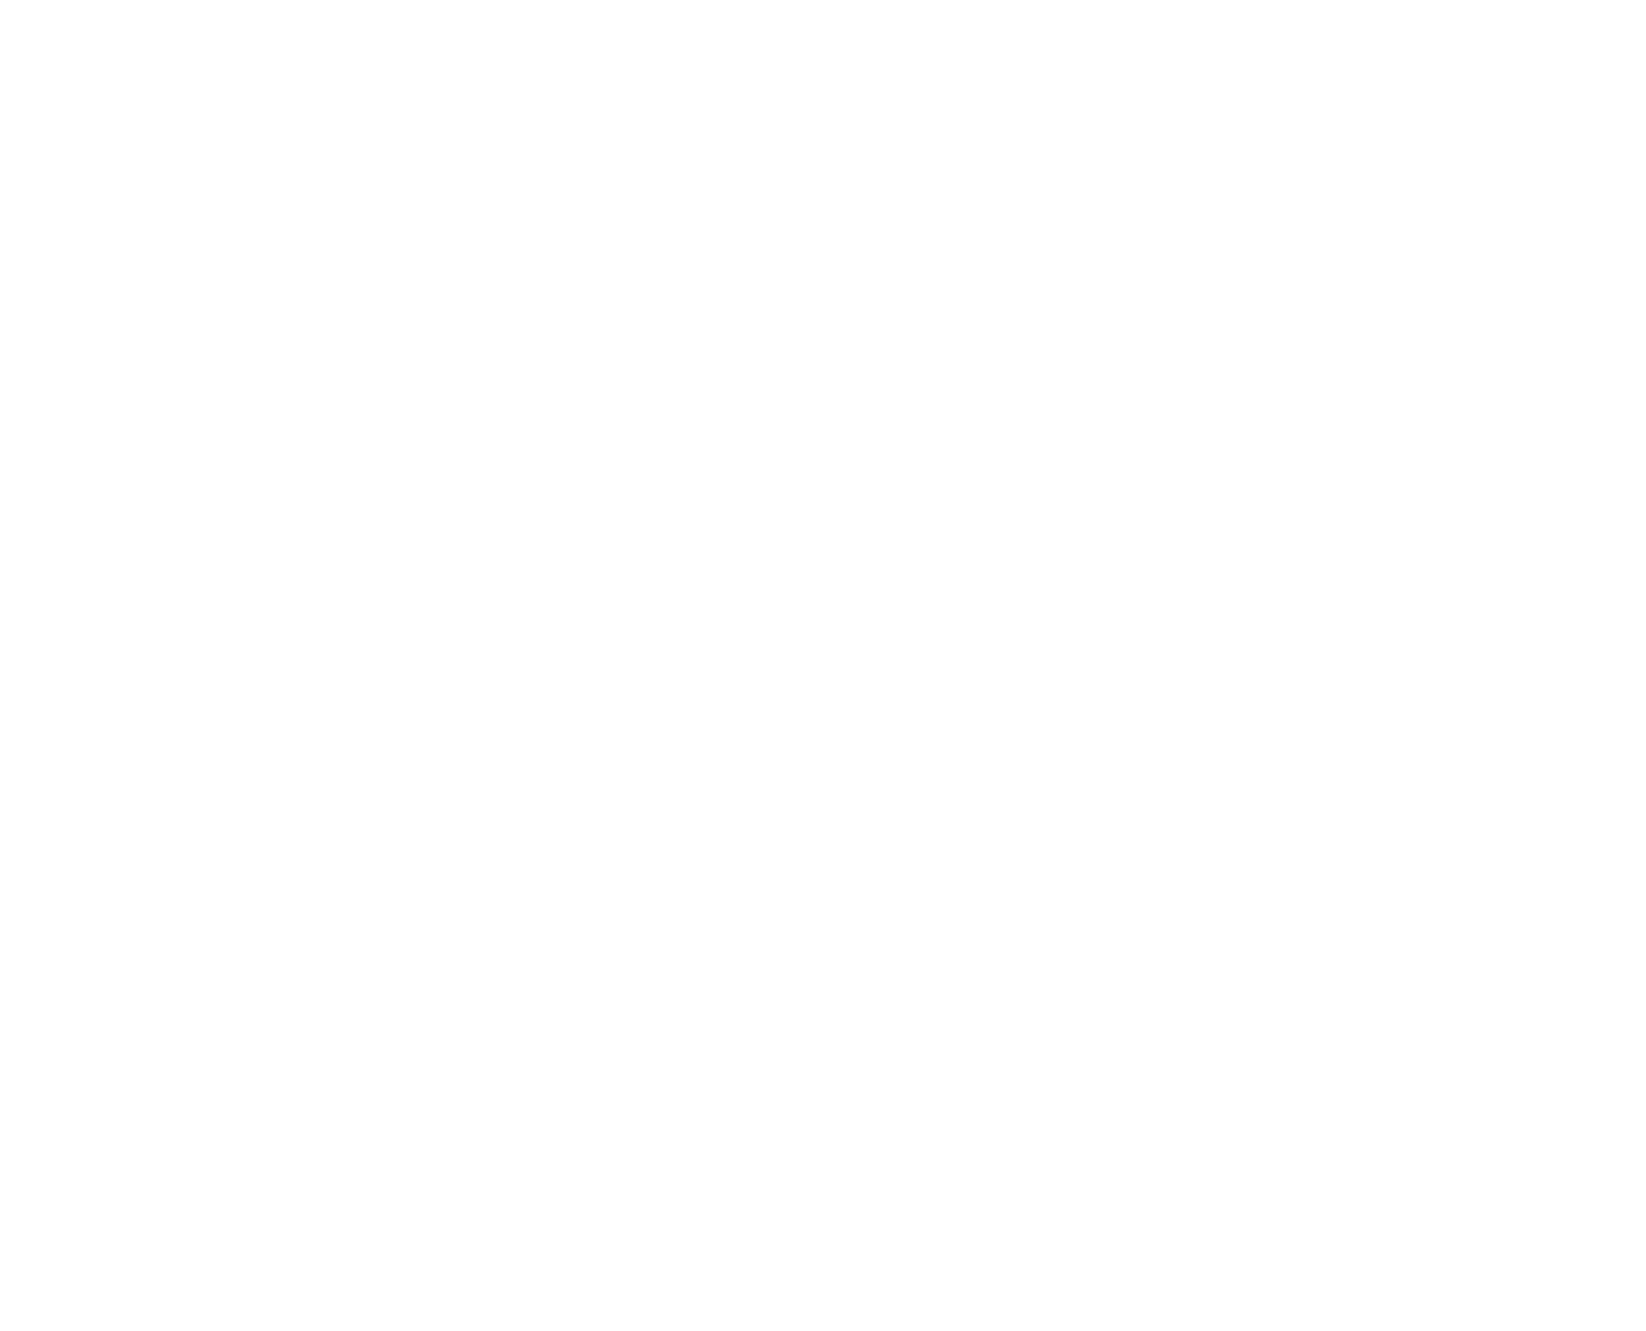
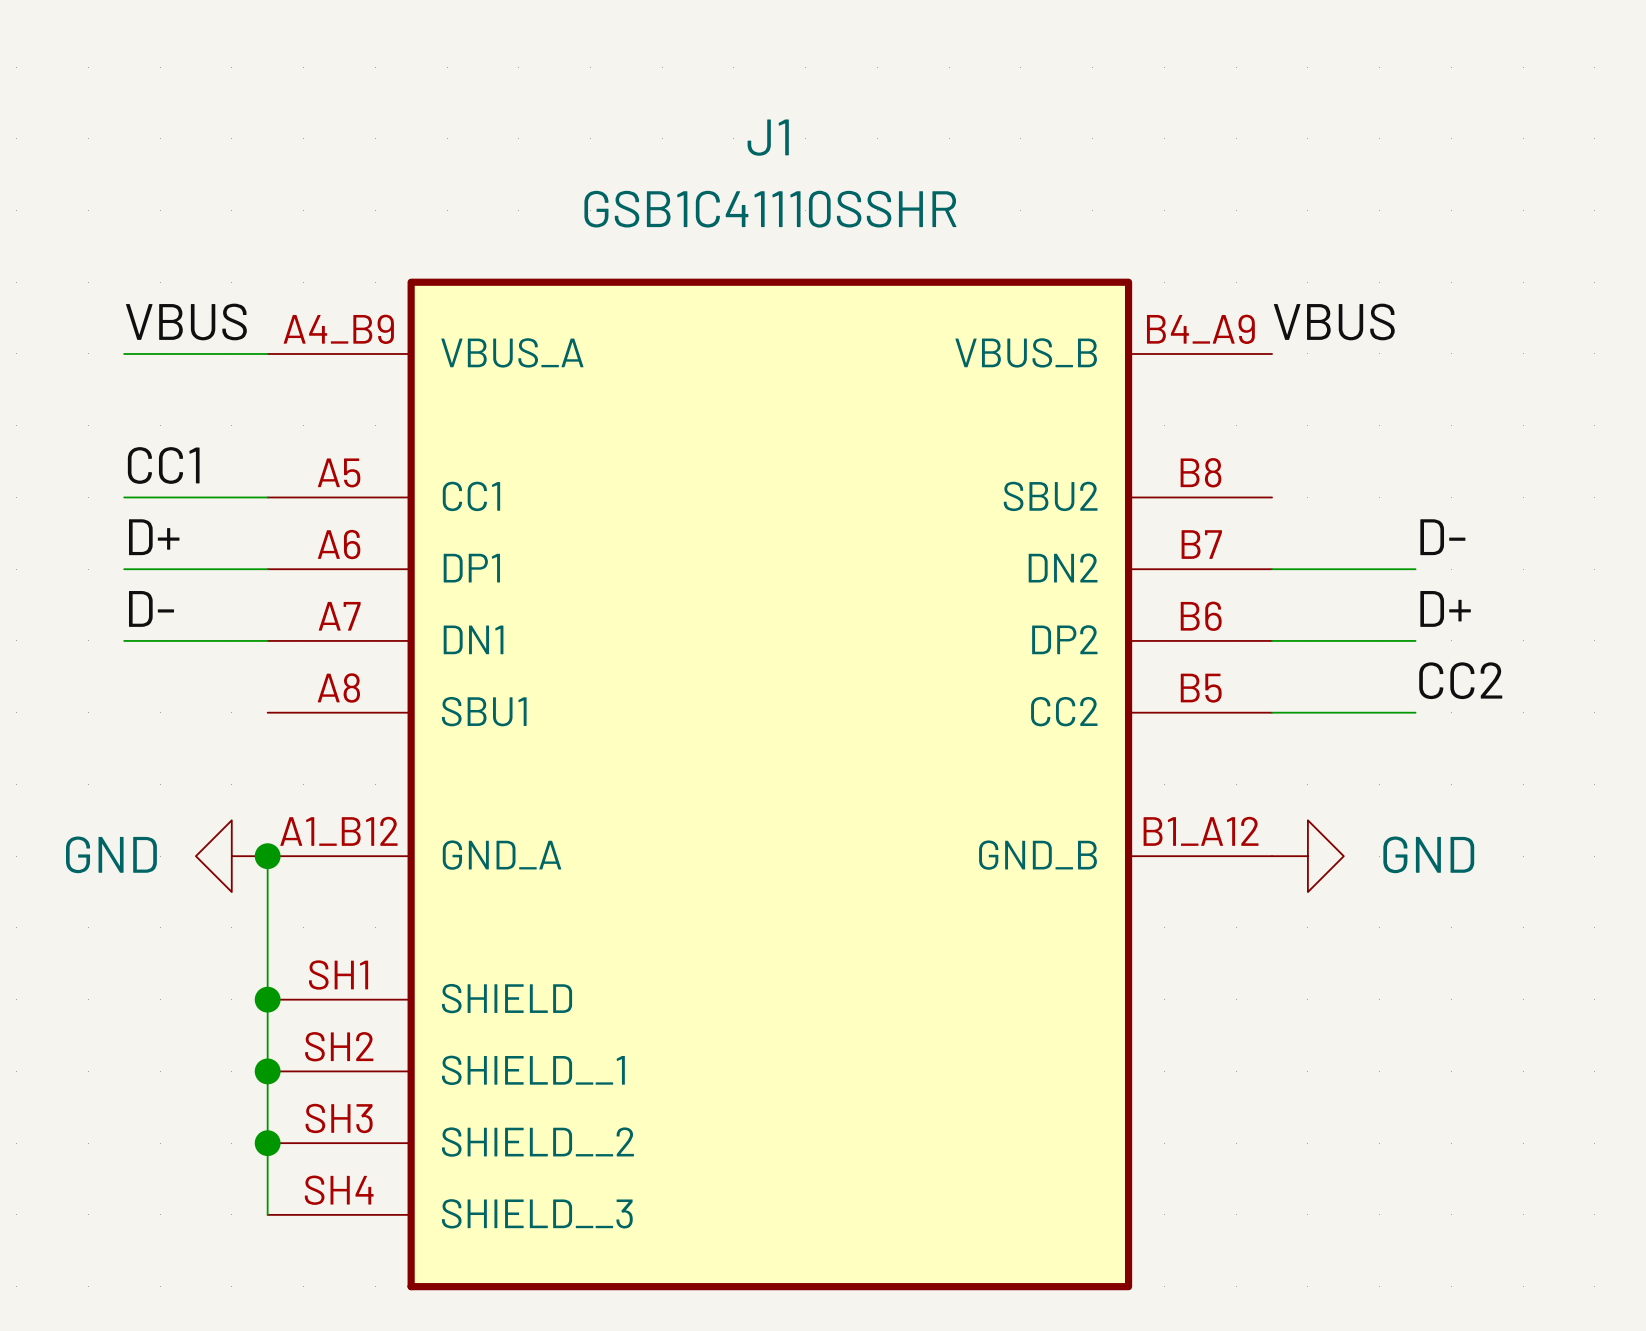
label: none -> VBUS (186, 321)
label: none -> VBUS (1334, 321)
wire: none -> (124, 353) (267, 353)
label: none -> CC1 (163, 465)
wire: none -> (124, 497) (267, 497)
label: none -> D+ (154, 537)
label: none -> D- (1442, 537)
wire: none -> (124, 569) (267, 569)
wire: none -> (1272, 569) (1415, 569)
label: none -> D- (151, 608)
label: none -> D+ (1445, 608)
wire: none -> (124, 640) (267, 640)
wire: none -> (1272, 640) (1415, 640)
label: none -> CC2 (1460, 680)
wire: none -> (1272, 712) (1415, 712)
J1: none -> GSB1C41110SSHR (769, 784)
power symbol: none -> GND (231, 856)
wire: none -> (267, 856) (267, 1214)
junction: none -> (267, 856)
power symbol: none -> GND (1307, 856)
junction: none -> (267, 999)
junction: none -> (267, 1071)
junction: none -> (267, 1143)

